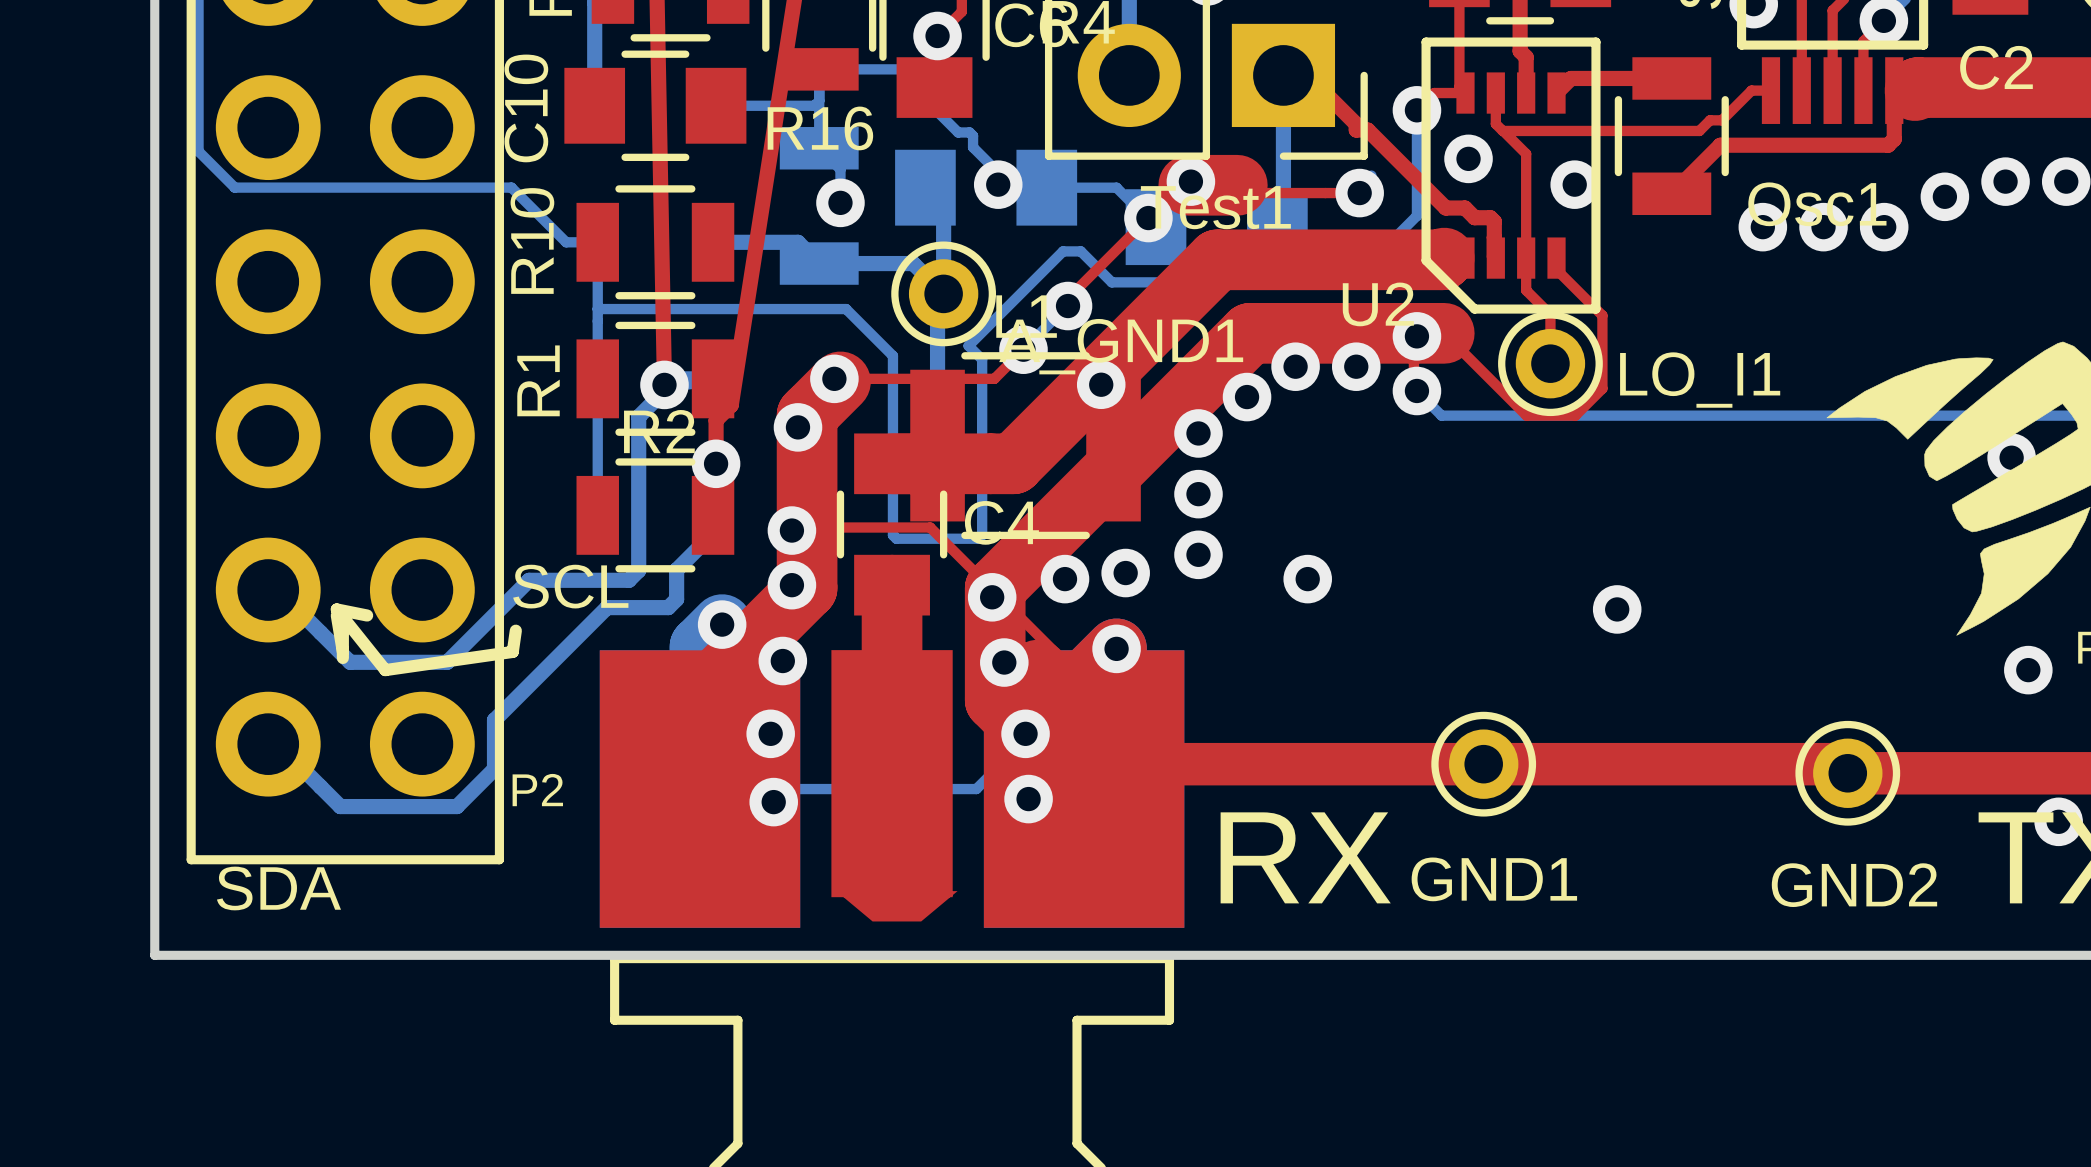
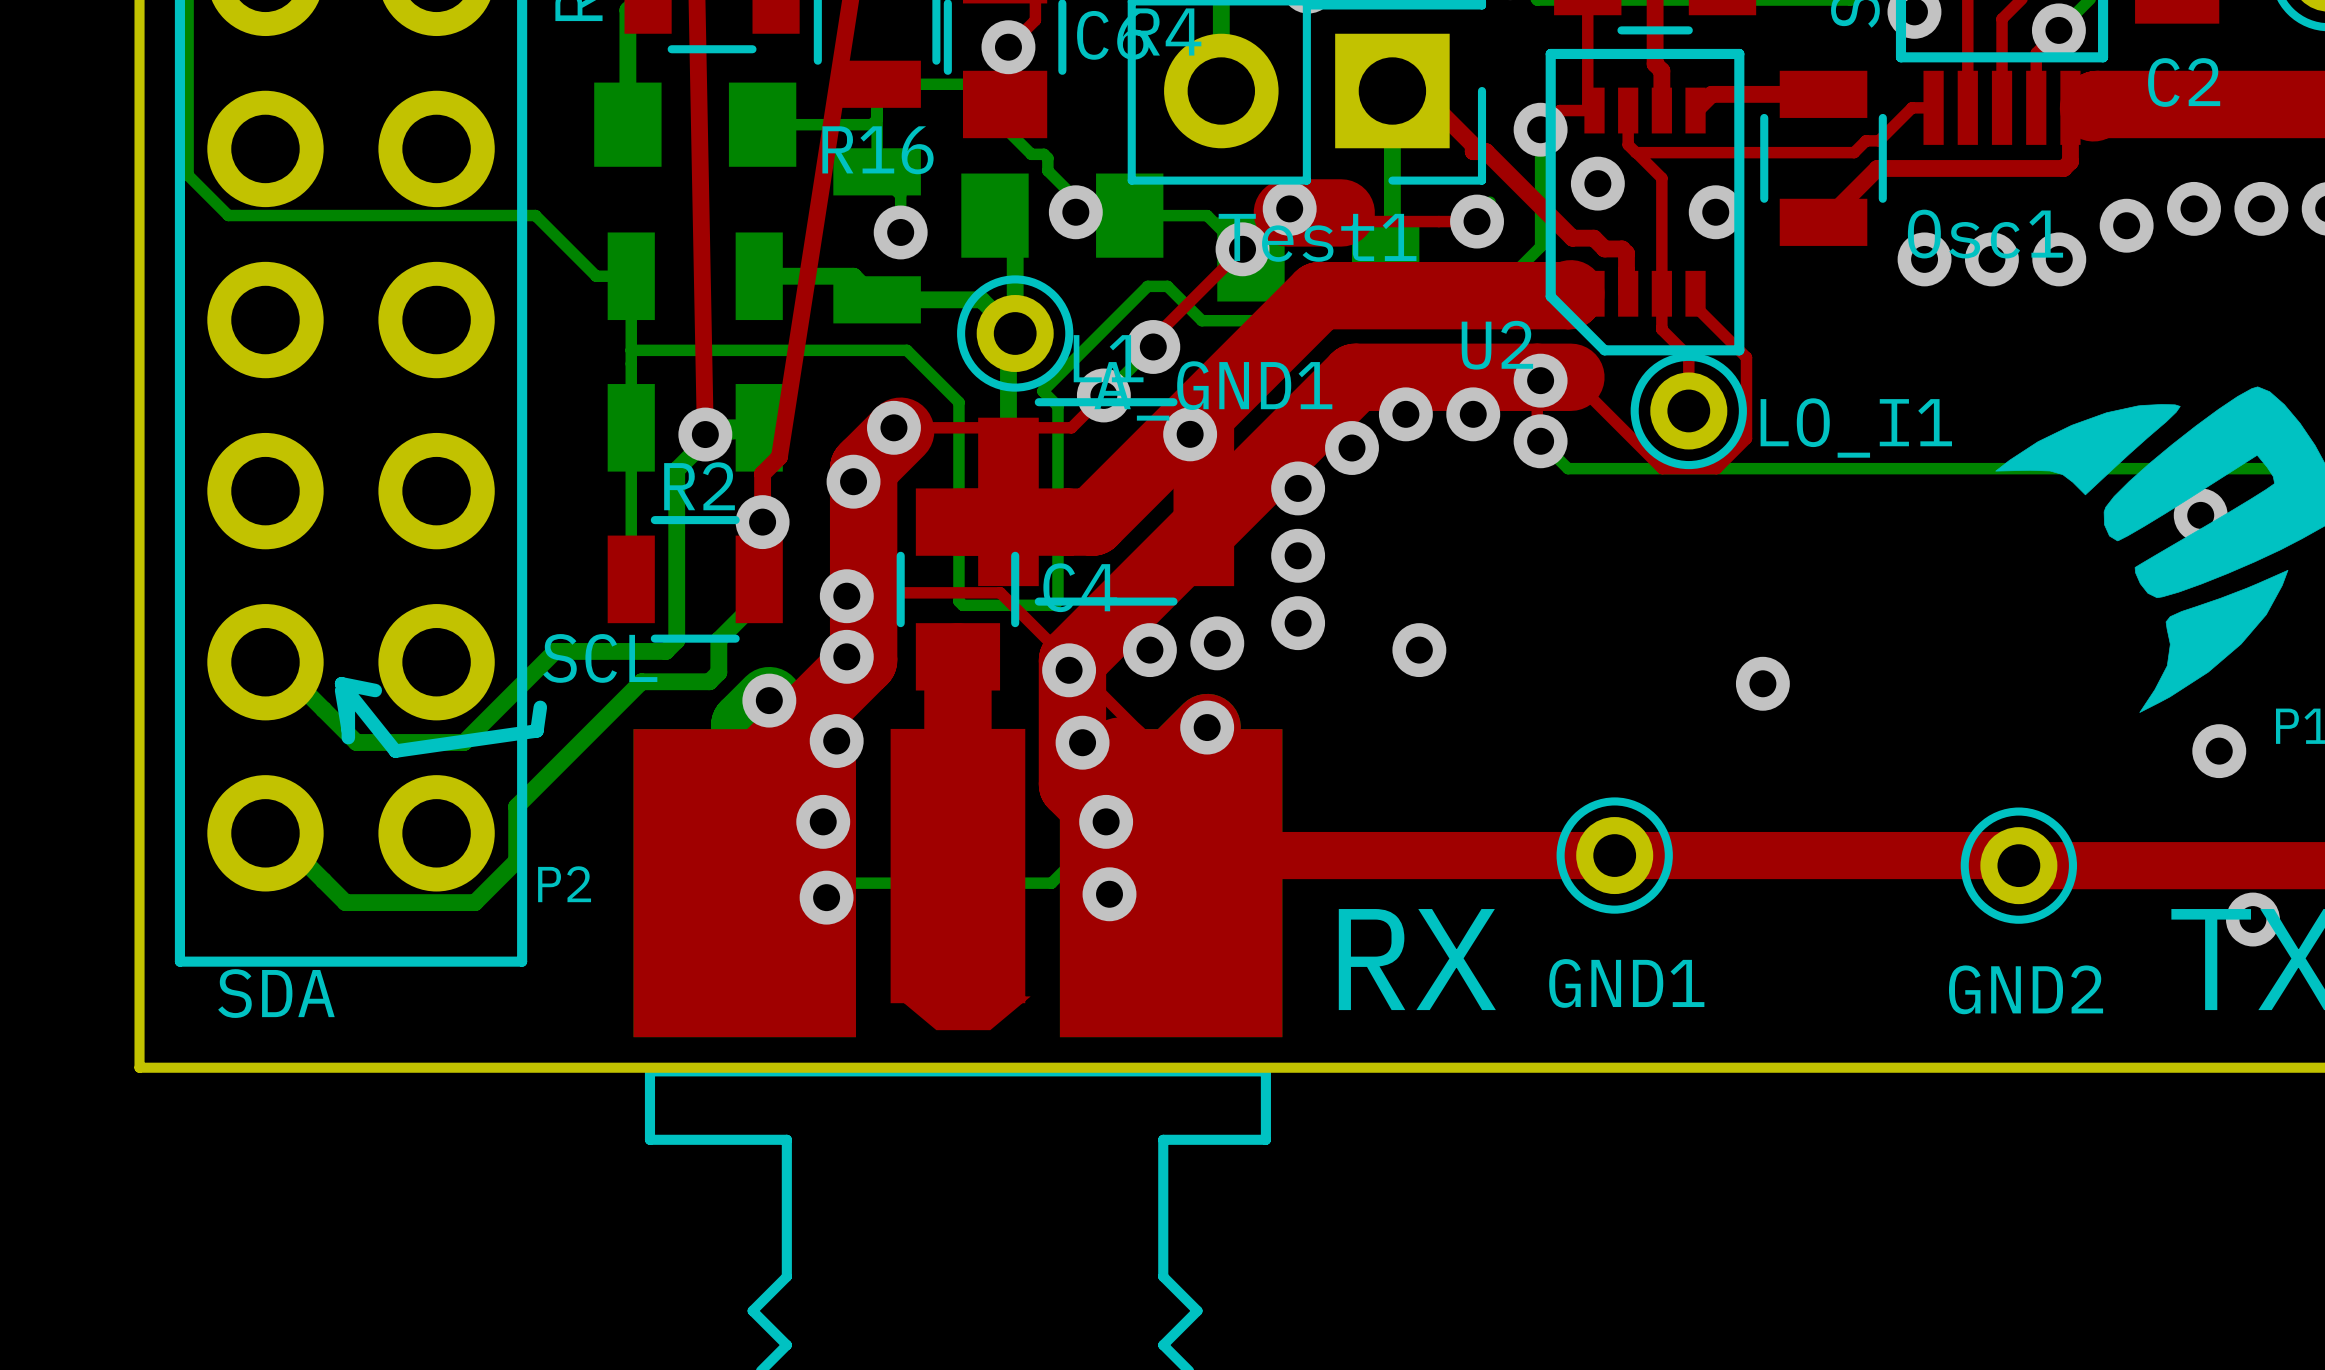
C10 side: top (655, 105) -> bottom (695, 124)
R10 side: top (655, 242) -> bottom (695, 276)
R1 side: top (655, 378) -> bottom (695, 427)

